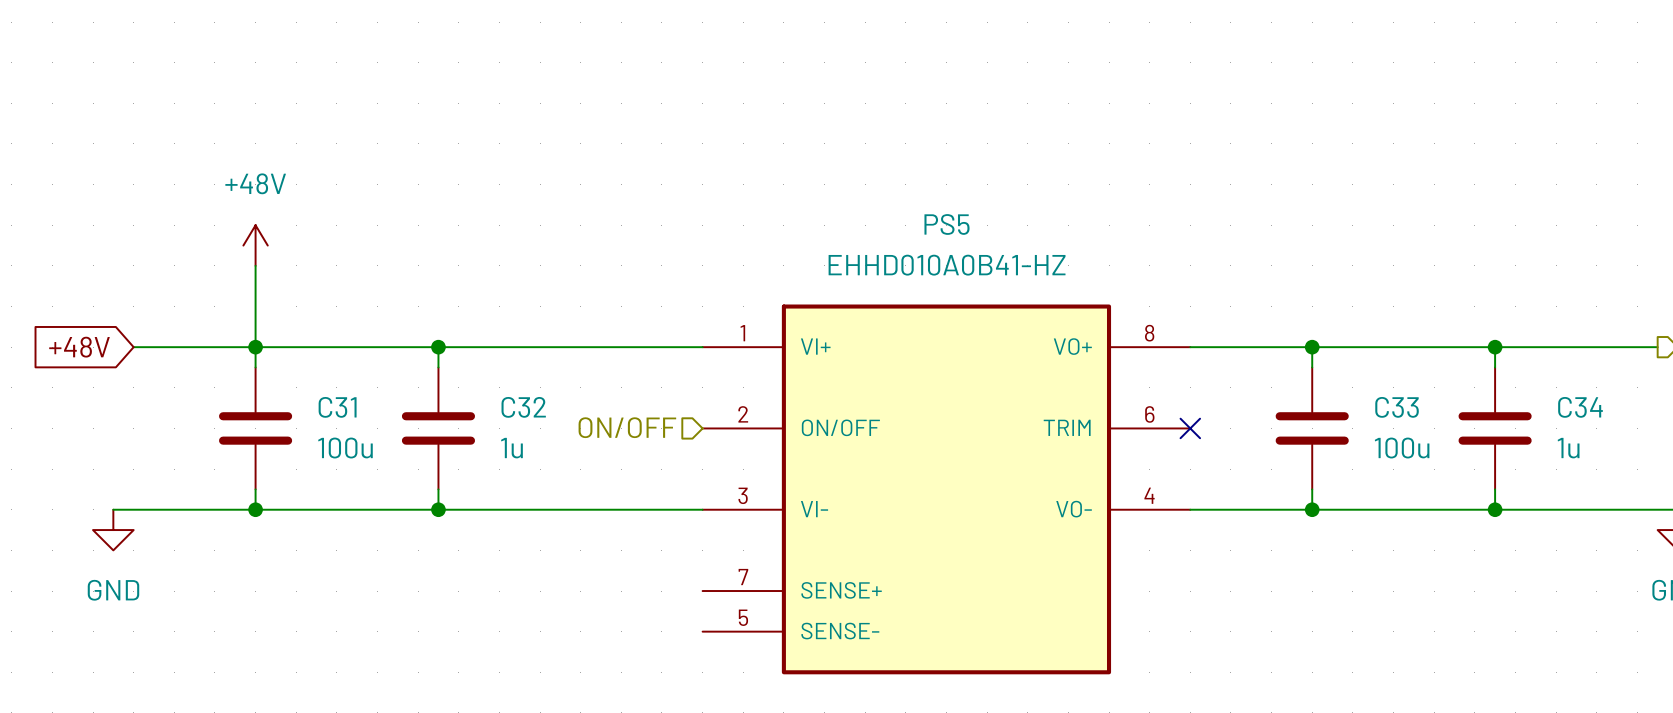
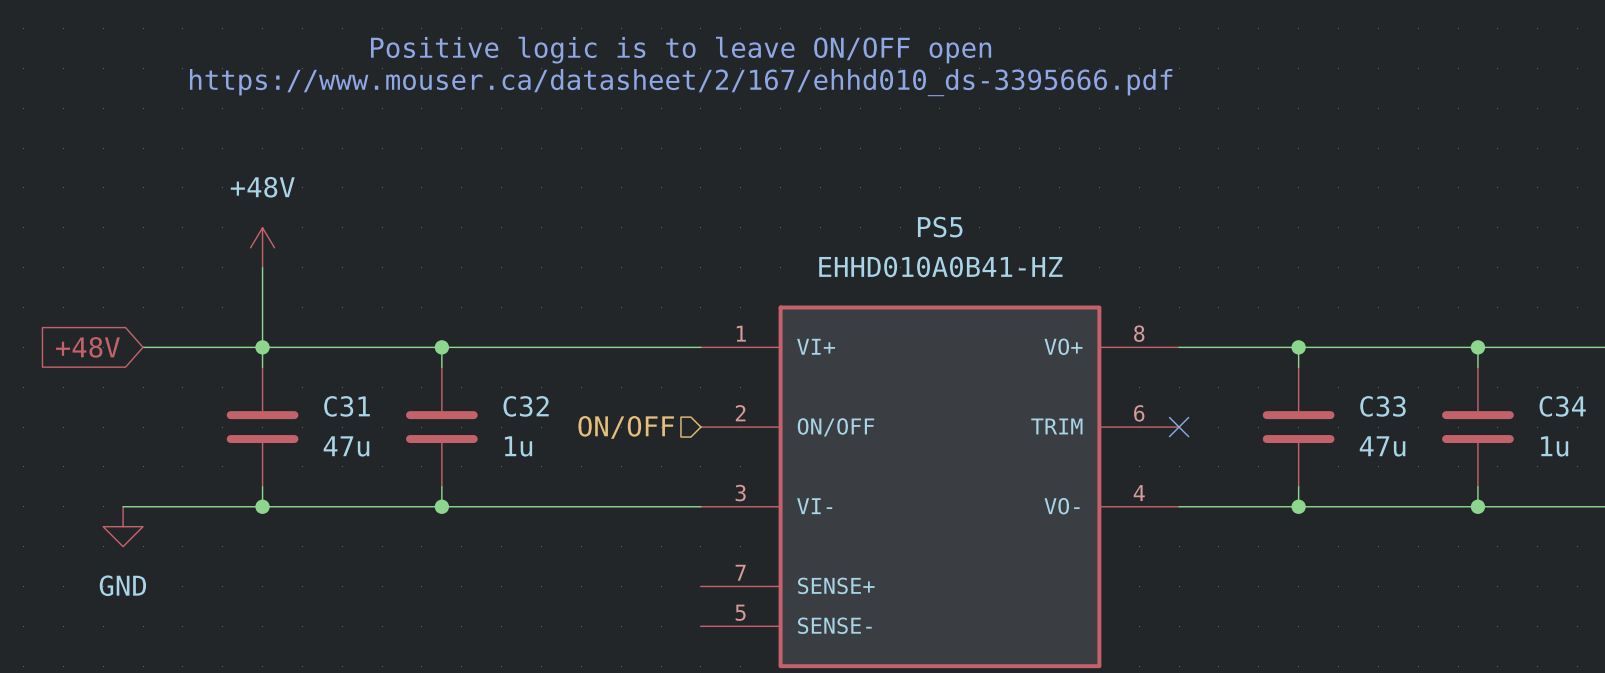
text: none -> Positive logic is to leave ON/OFF open (681, 50)
text: none -> https://www.mouser.ca/datasheet/2/167/ehhd010_ds-3395666.pdf (681, 82)
C31 value: 100u (345, 448) -> 47u (346, 446)
C33 value: 100u (1402, 448) -> 47u (1382, 446)

